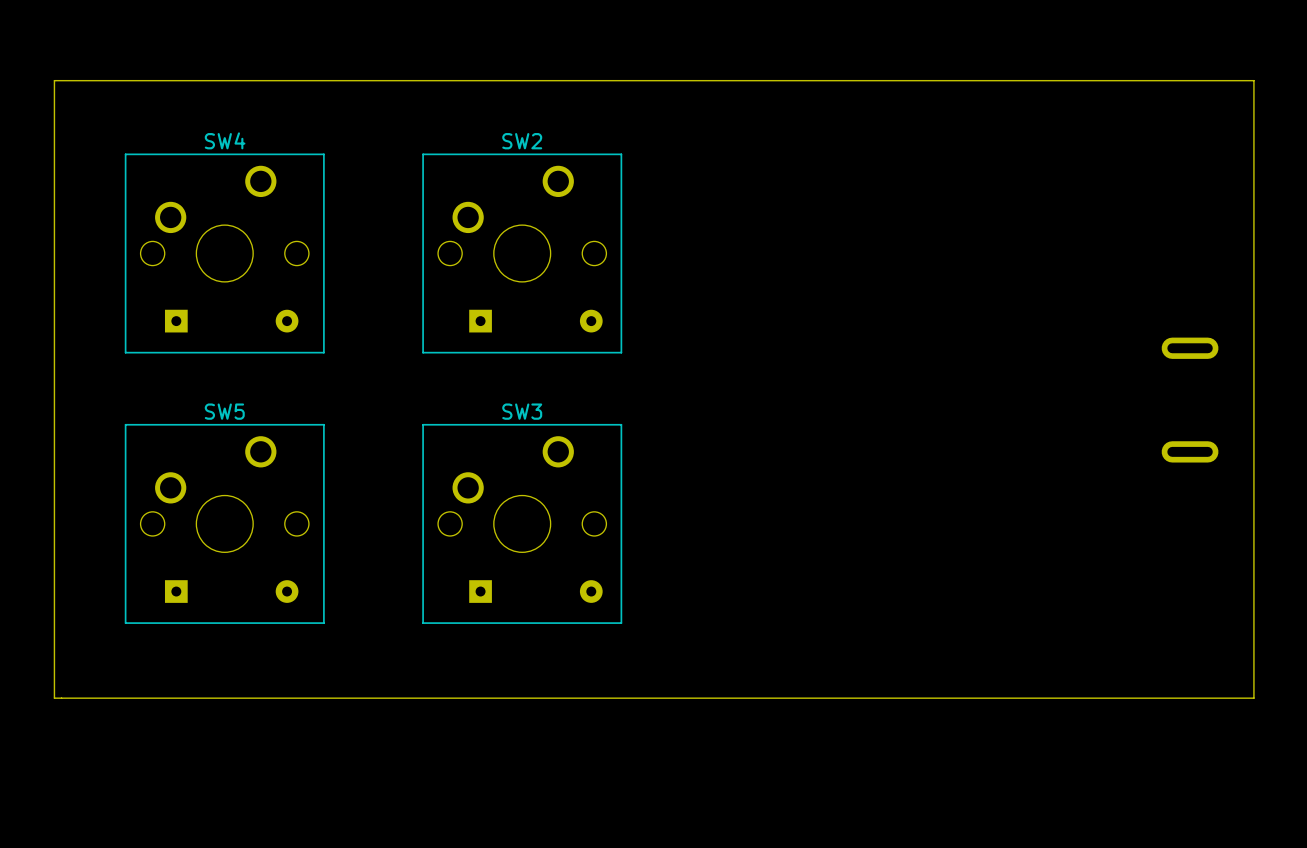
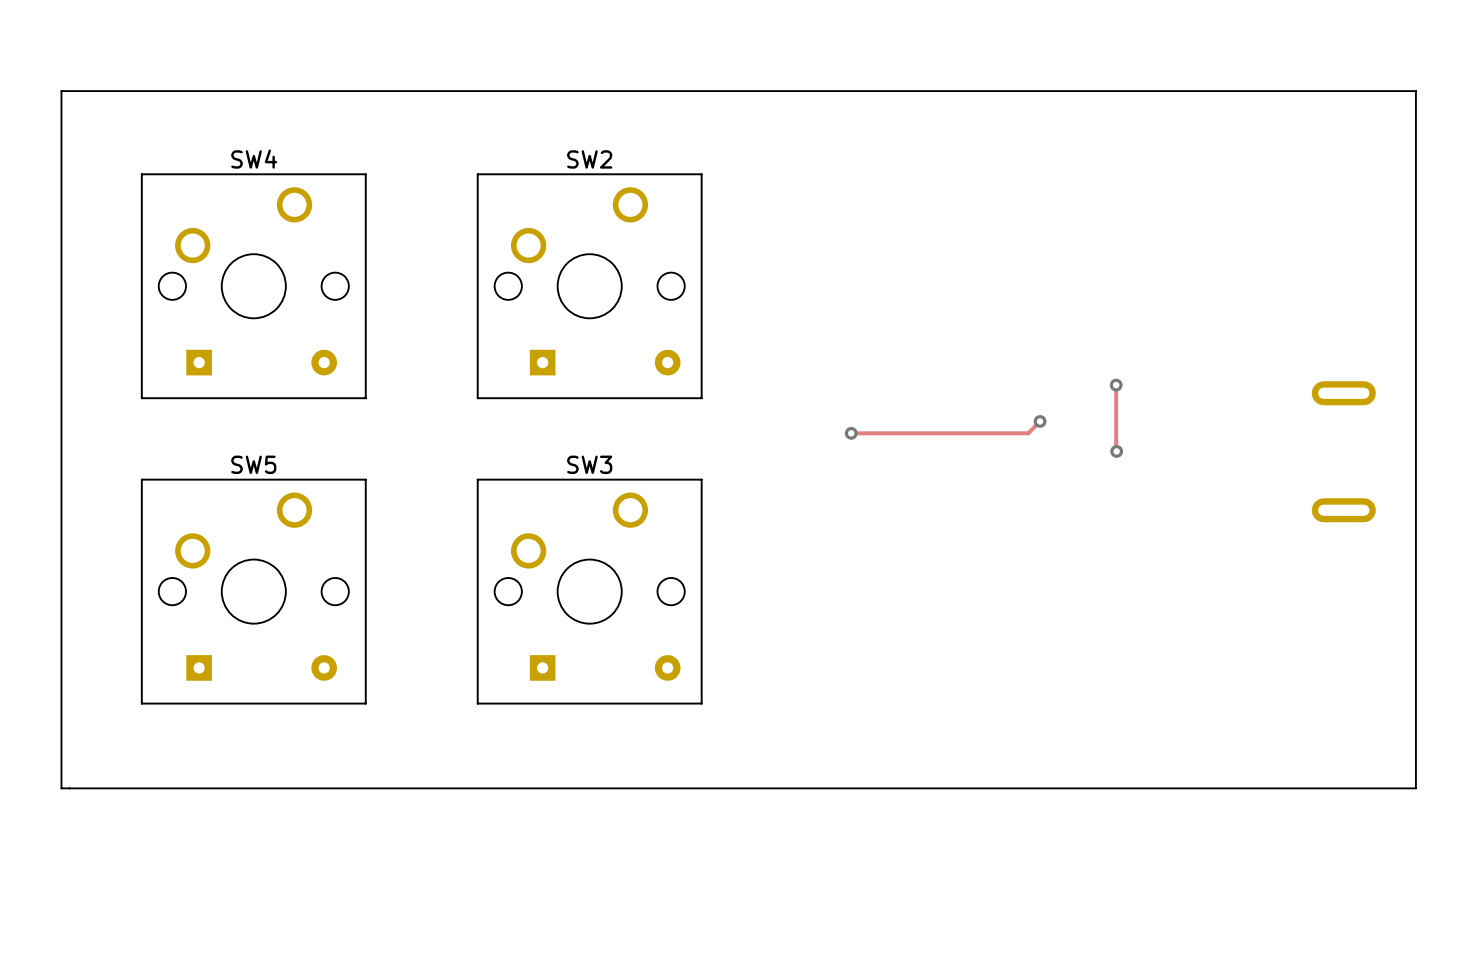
track: none -> (1116, 385) (1116, 451)
via: none -> (1116, 385)
track: none -> (1040, 421) (1028, 433) (851, 433)
via: none -> (1040, 421)
via: none -> (851, 433)
via: none -> (1116, 451)

